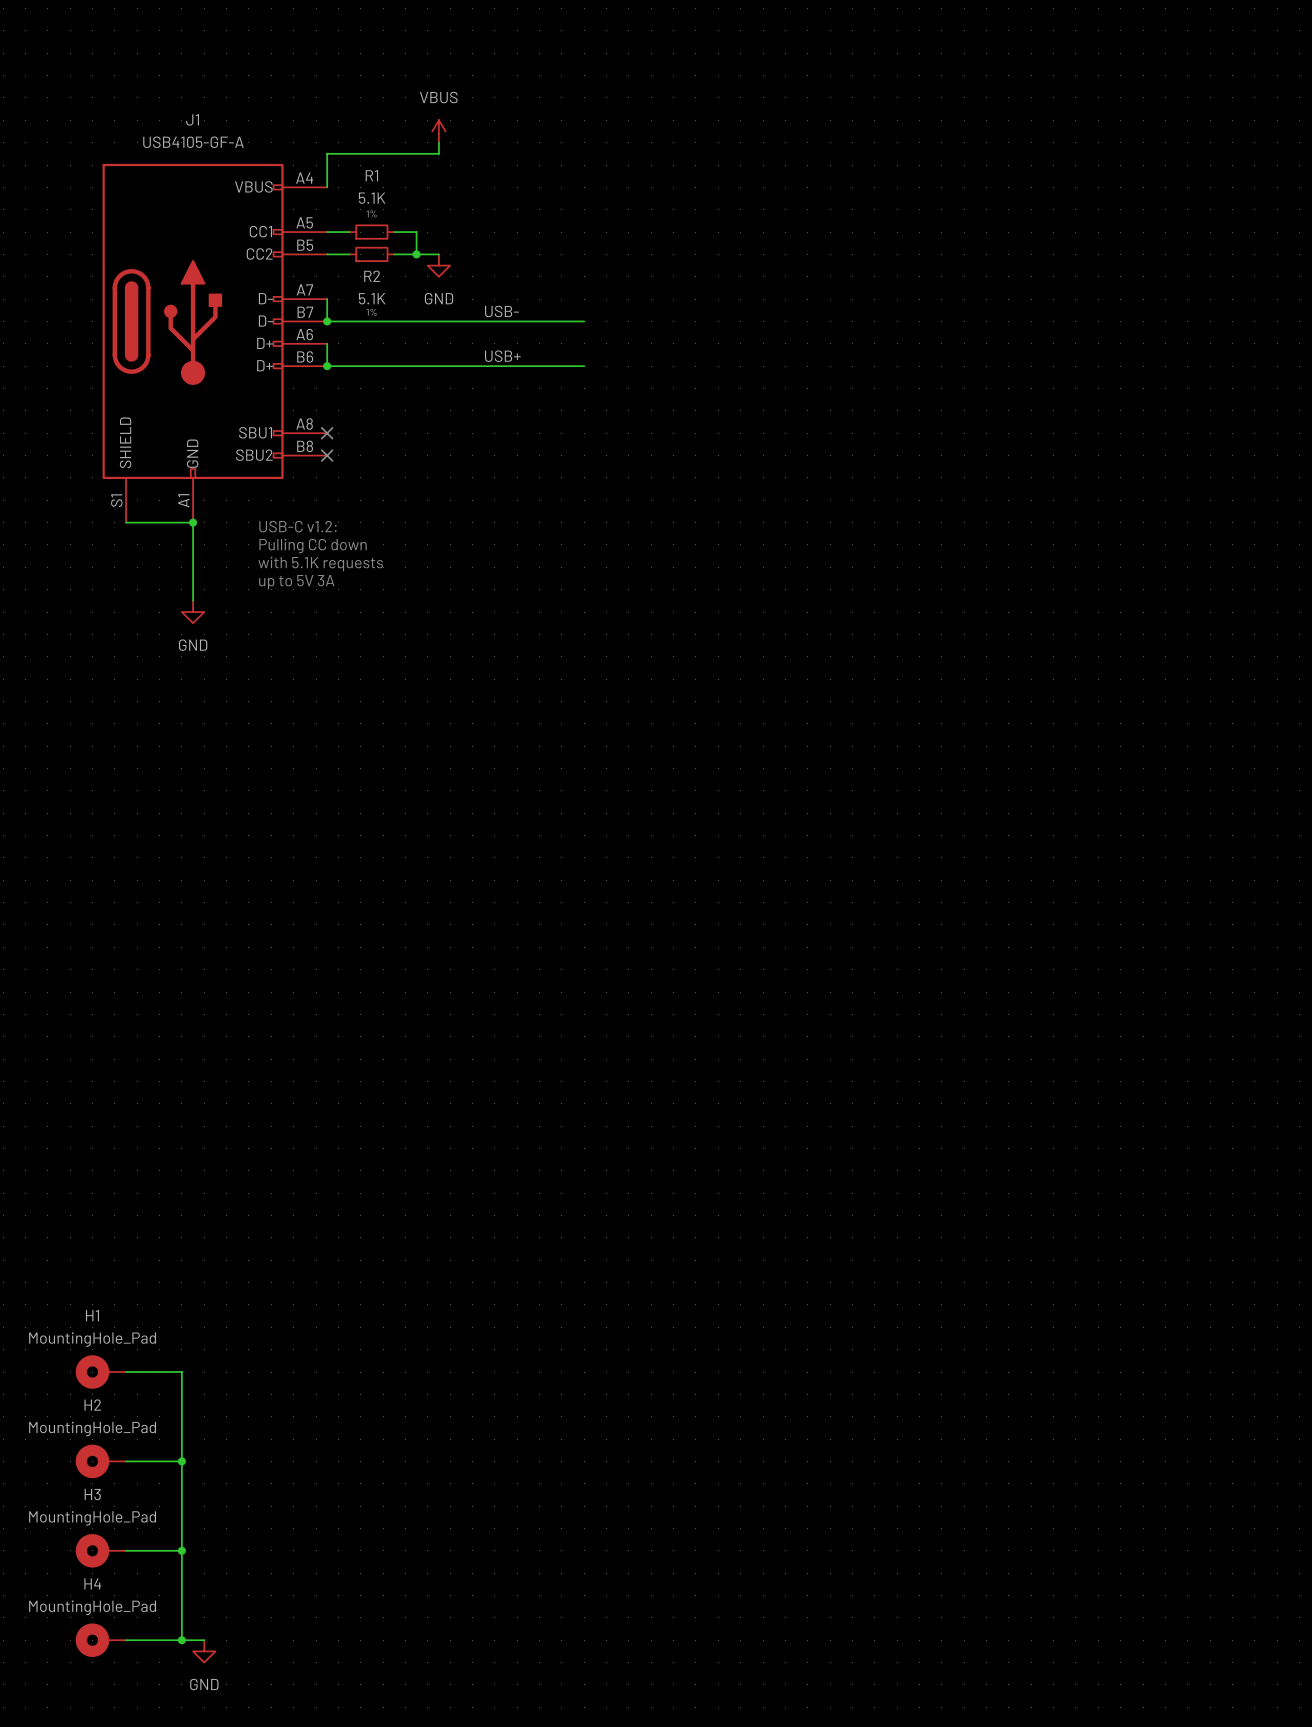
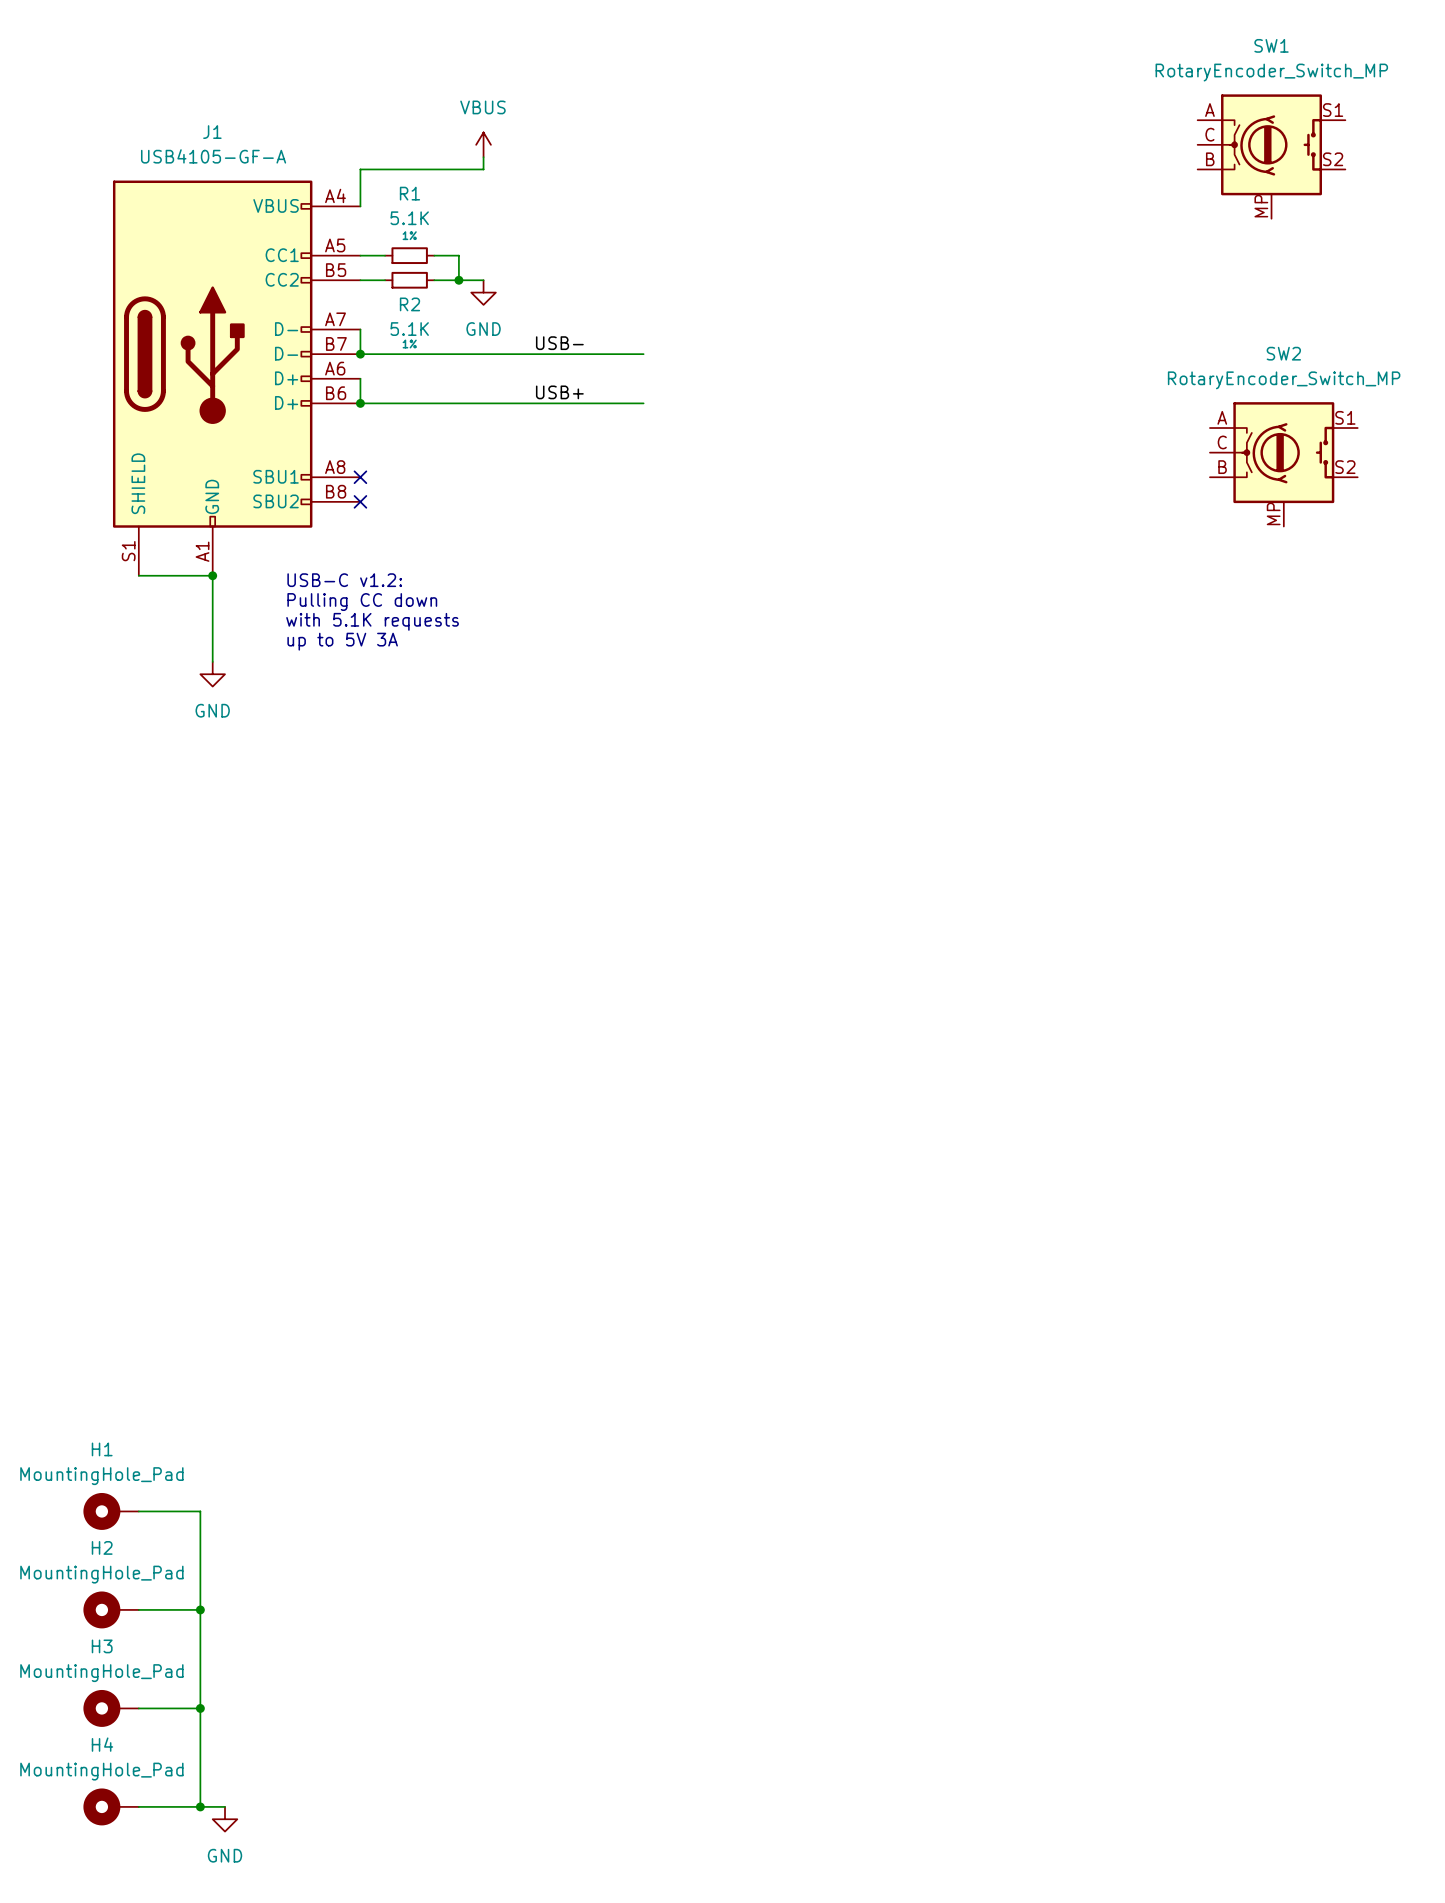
SW1: none -> RotaryEncoder_Switch_MP (1271, 156)
SW2: none -> RotaryEncoder_Switch_MP (1283, 464)

